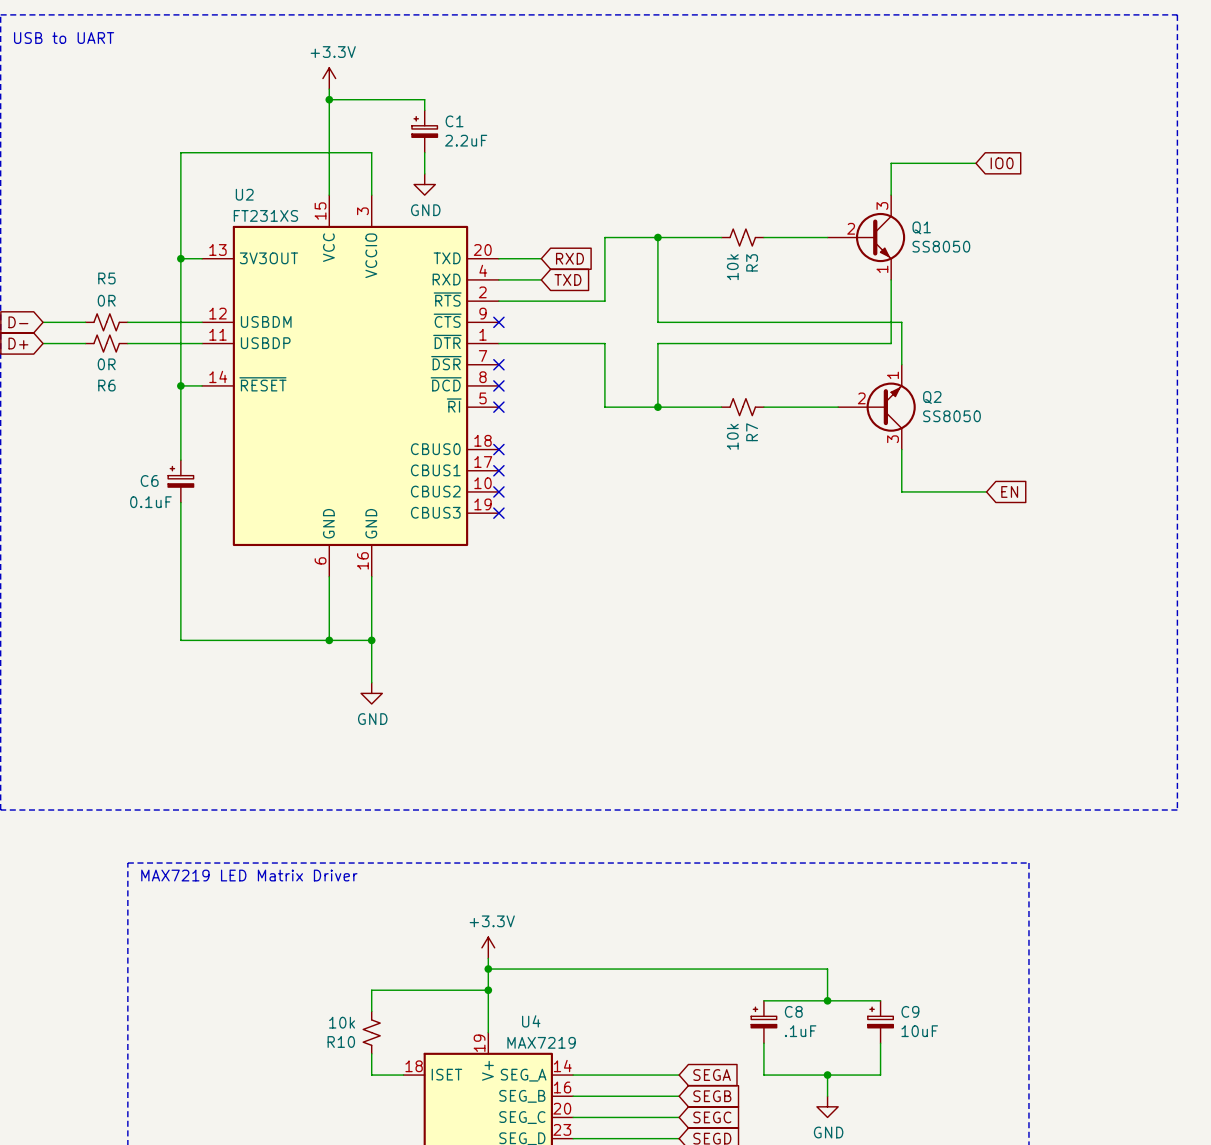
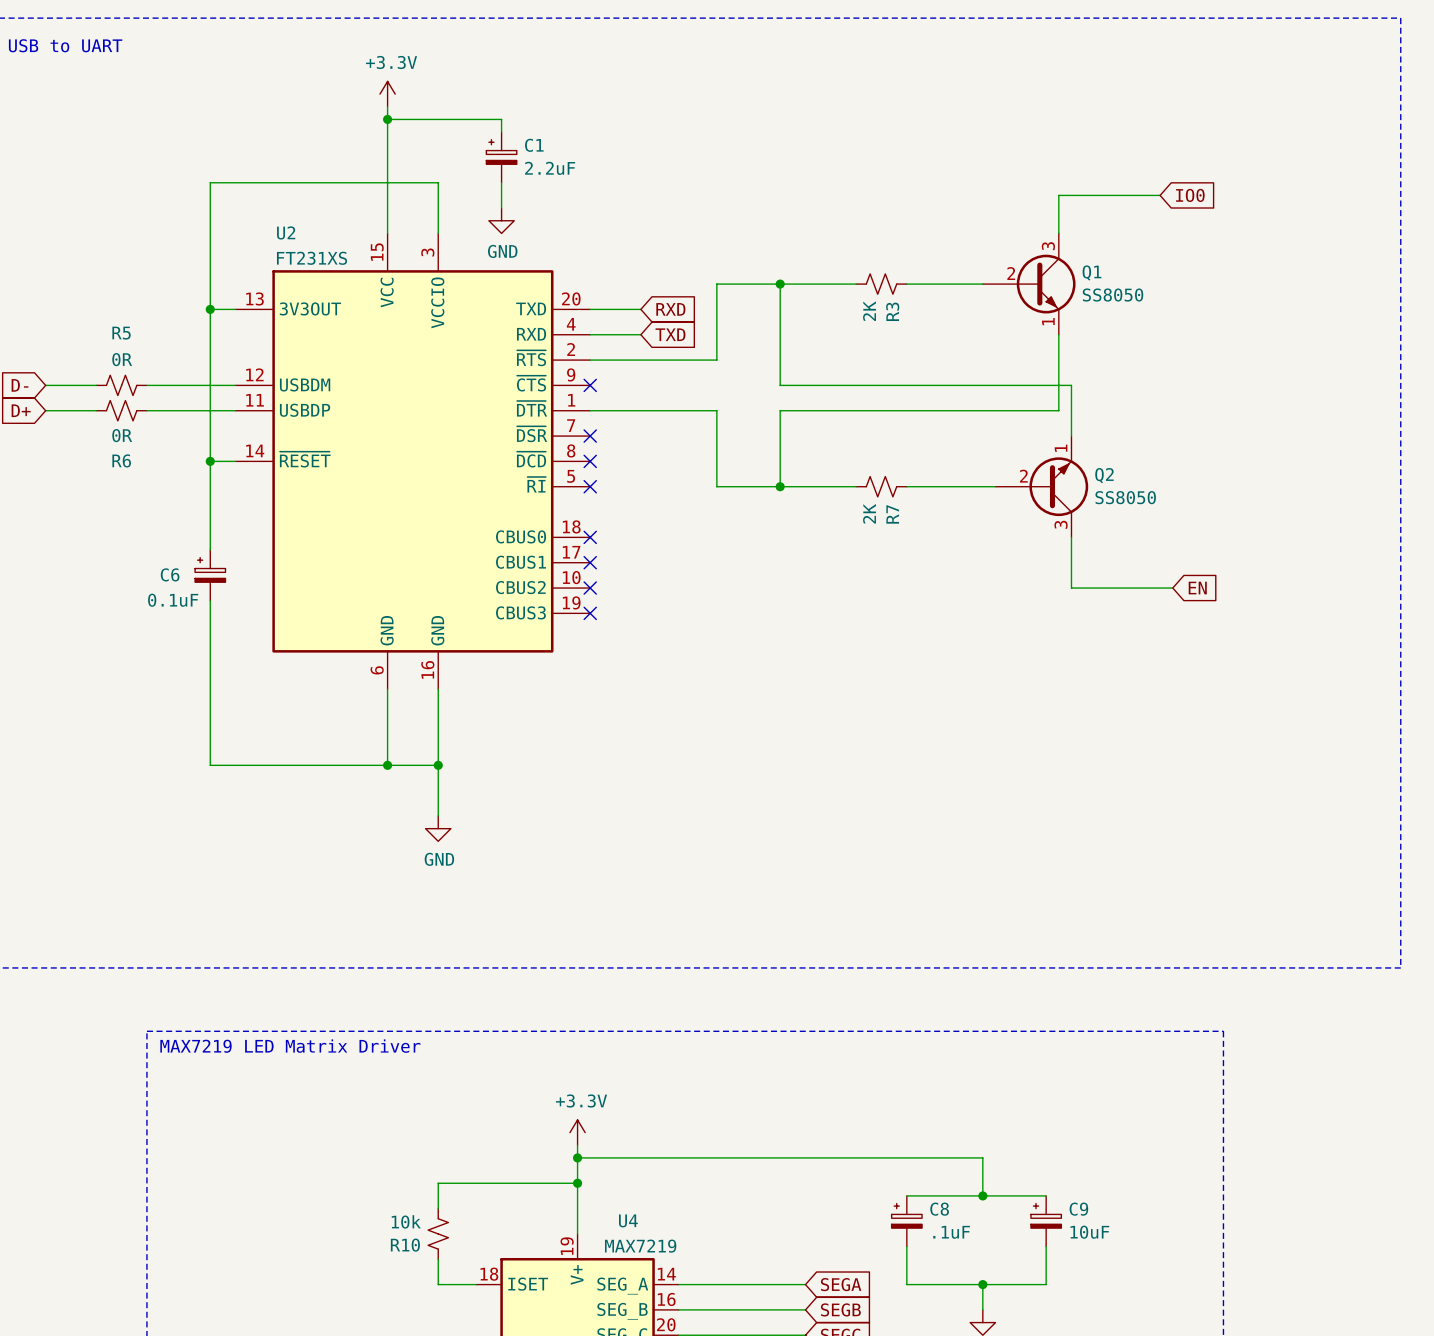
R3 value: 10k (732, 267) -> 2K (869, 311)
R7 value: 10k (732, 436) -> 2K (869, 513)

